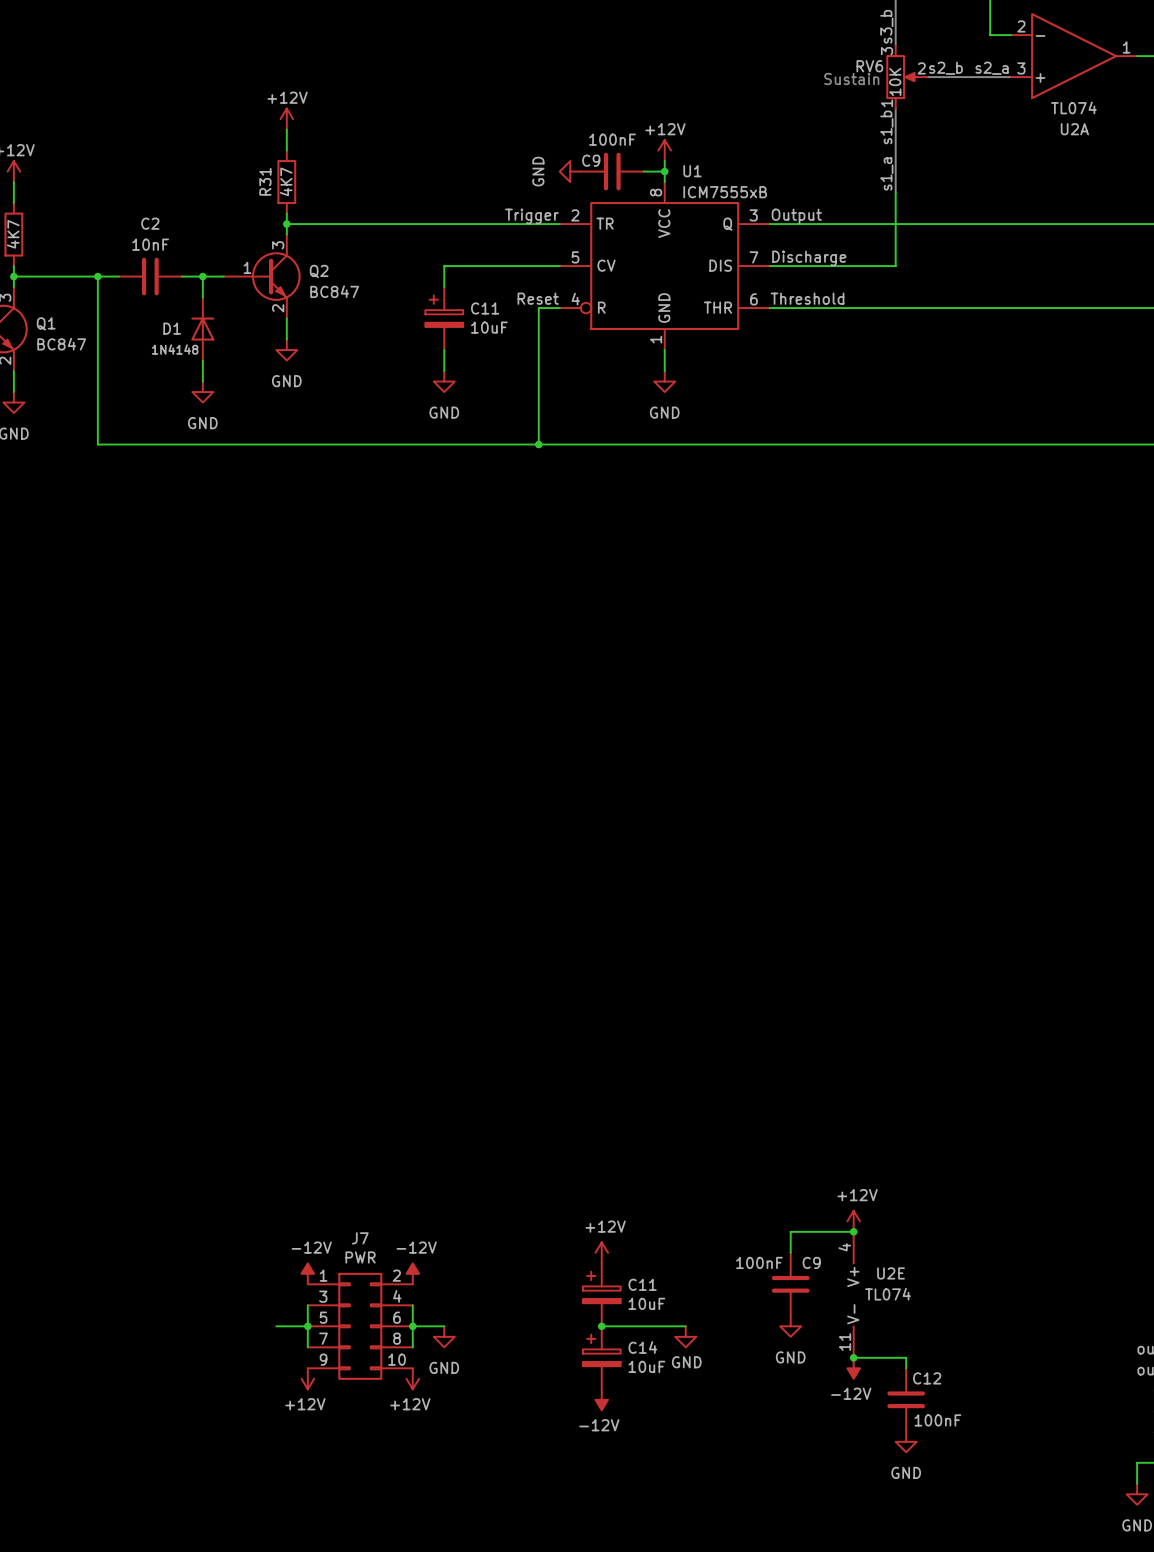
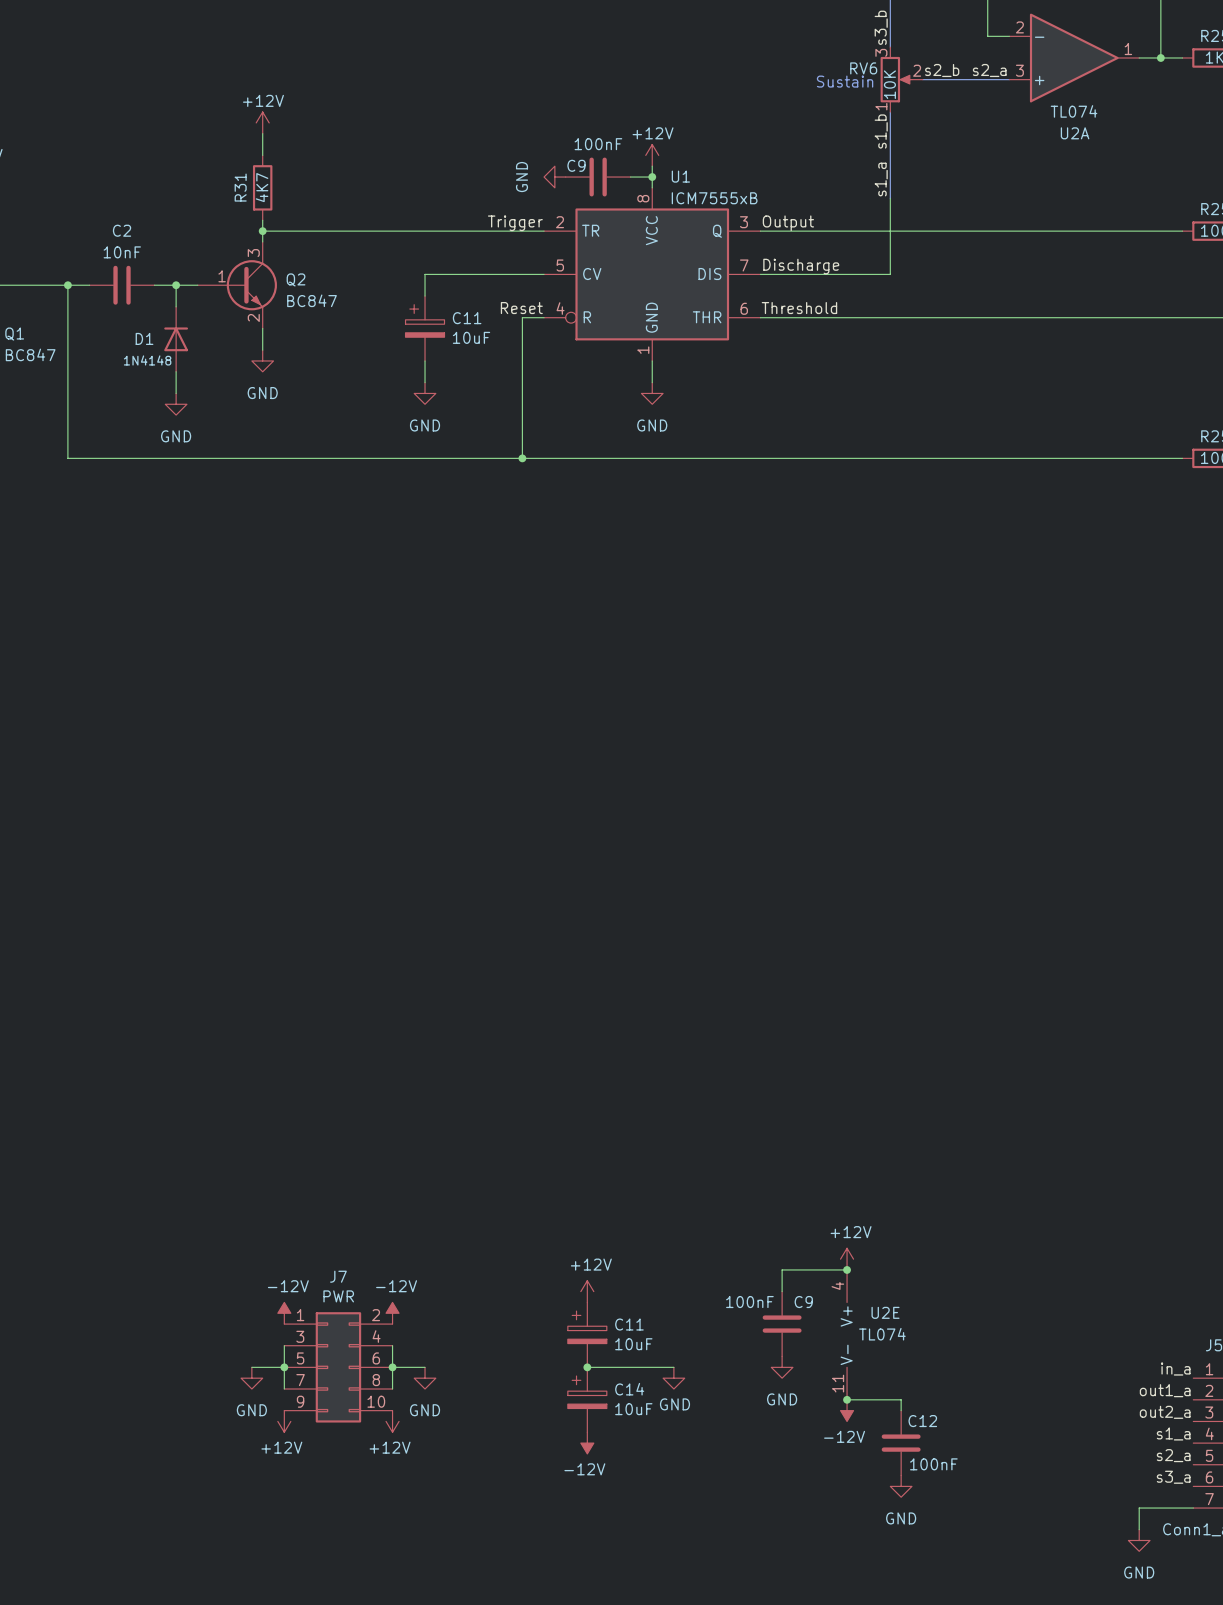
power symbol: none -> GND (251, 1378)

